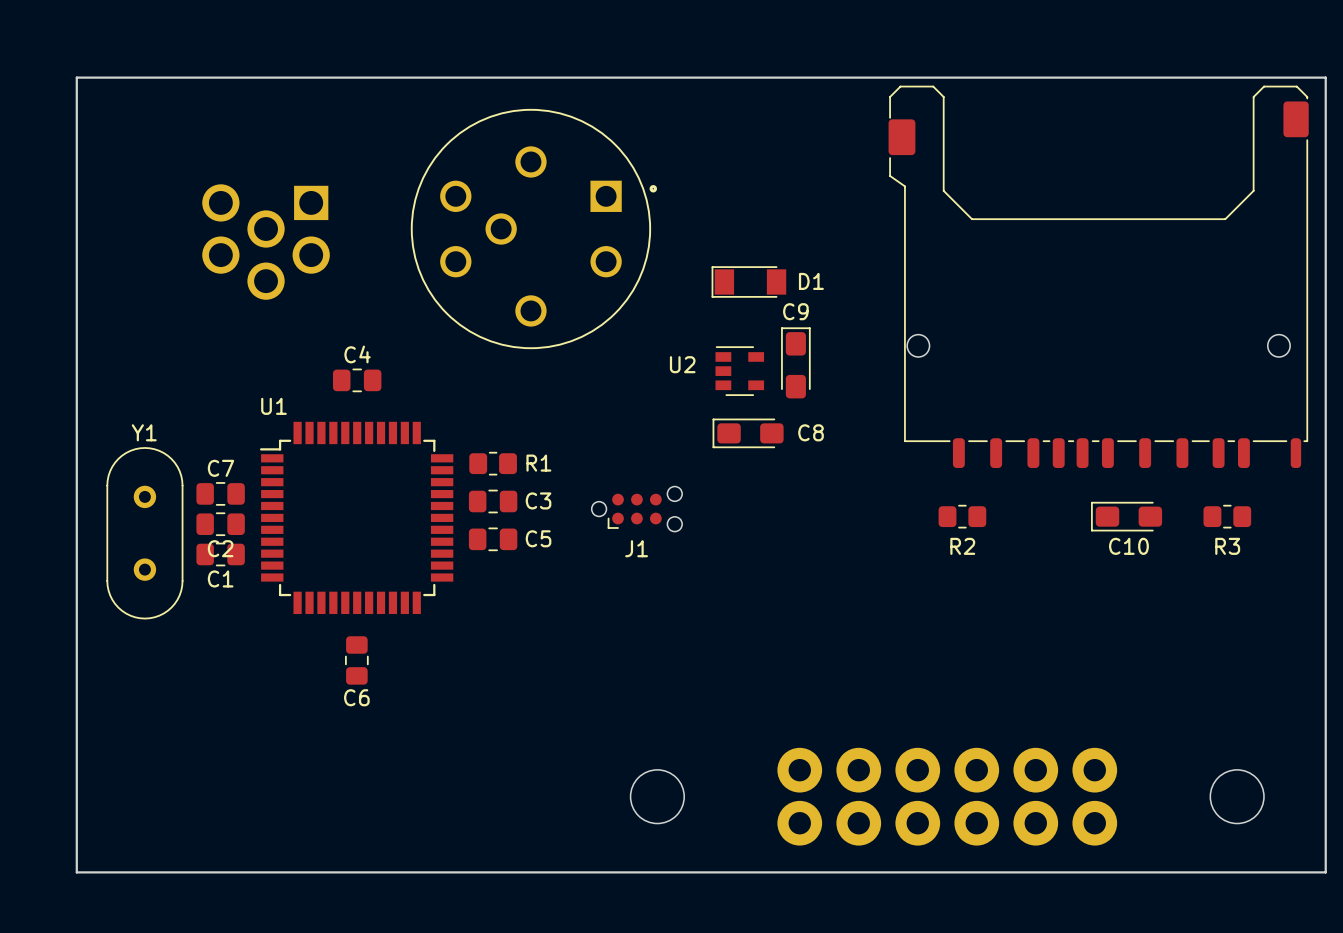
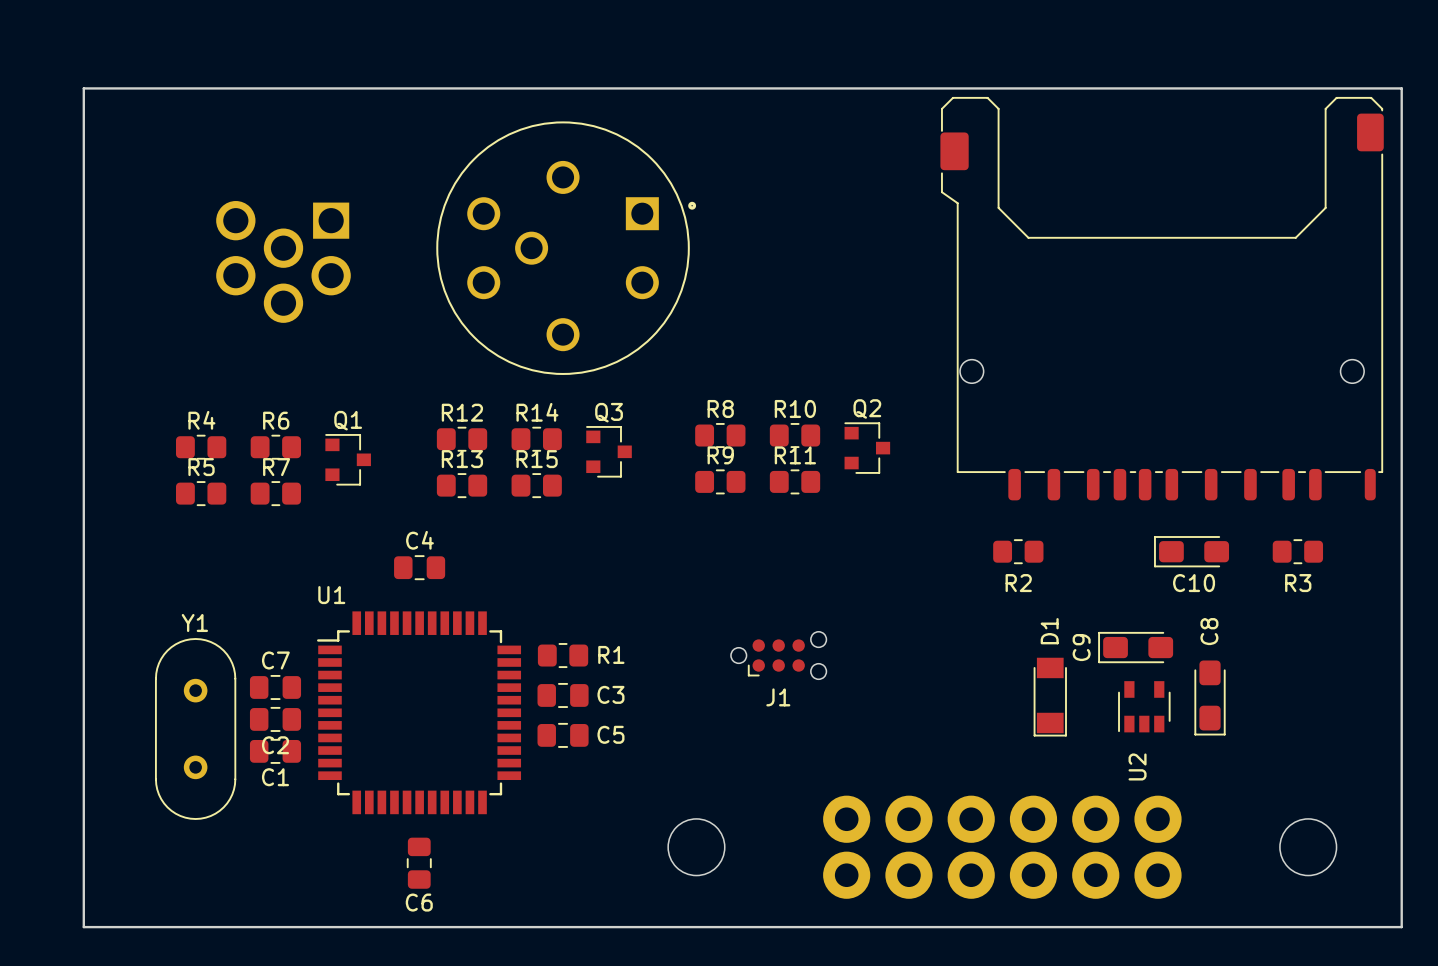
D1 rotation: 0° (748, 281) -> 90° counterclockwise (1050, 697)
D1 position: (748, 281) -> (1050, 697)
C9 rotation: 0° (795, 362) -> 90° counterclockwise (1135, 647)
C9 position: (795, 362) -> (1135, 647)
U2 rotation: 0° (739, 371) -> 90° counterclockwise (1144, 706)
U2 position: (739, 371) -> (1144, 706)
C4 position: (357, 380) -> (419, 567)
R8: none -> (720, 435)
R10: none -> (795, 435)
R12: none -> (462, 439)
R14: none -> (536, 439)
R4: none -> (201, 447)
R6: none -> (275, 447)
Q2: none -> (867, 448)
Q3: none -> (608, 451)
Q1: none -> (348, 459)
C8 rotation: 0° (748, 433) -> 90° counterclockwise (1210, 697)
C8 position: (748, 433) -> (1210, 697)
R9: none -> (720, 481)
R11: none -> (795, 481)
R13: none -> (462, 485)
R15: none -> (536, 485)
R5: none -> (201, 493)
R7: none -> (275, 493)
R1 position: (493, 463) -> (563, 655)
C7 position: (220, 493) -> (275, 687)
C3 position: (493, 501) -> (563, 695)
J1 position: (636, 509) -> (778, 655)
U1 position: (356, 517) -> (419, 712)
C2 position: (220, 524) -> (275, 719)
Y1 position: (144, 533) -> (195, 728)
C5 position: (493, 539) -> (563, 735)
C1 position: (220, 554) -> (275, 751)
C6 position: (356, 660) -> (419, 863)

